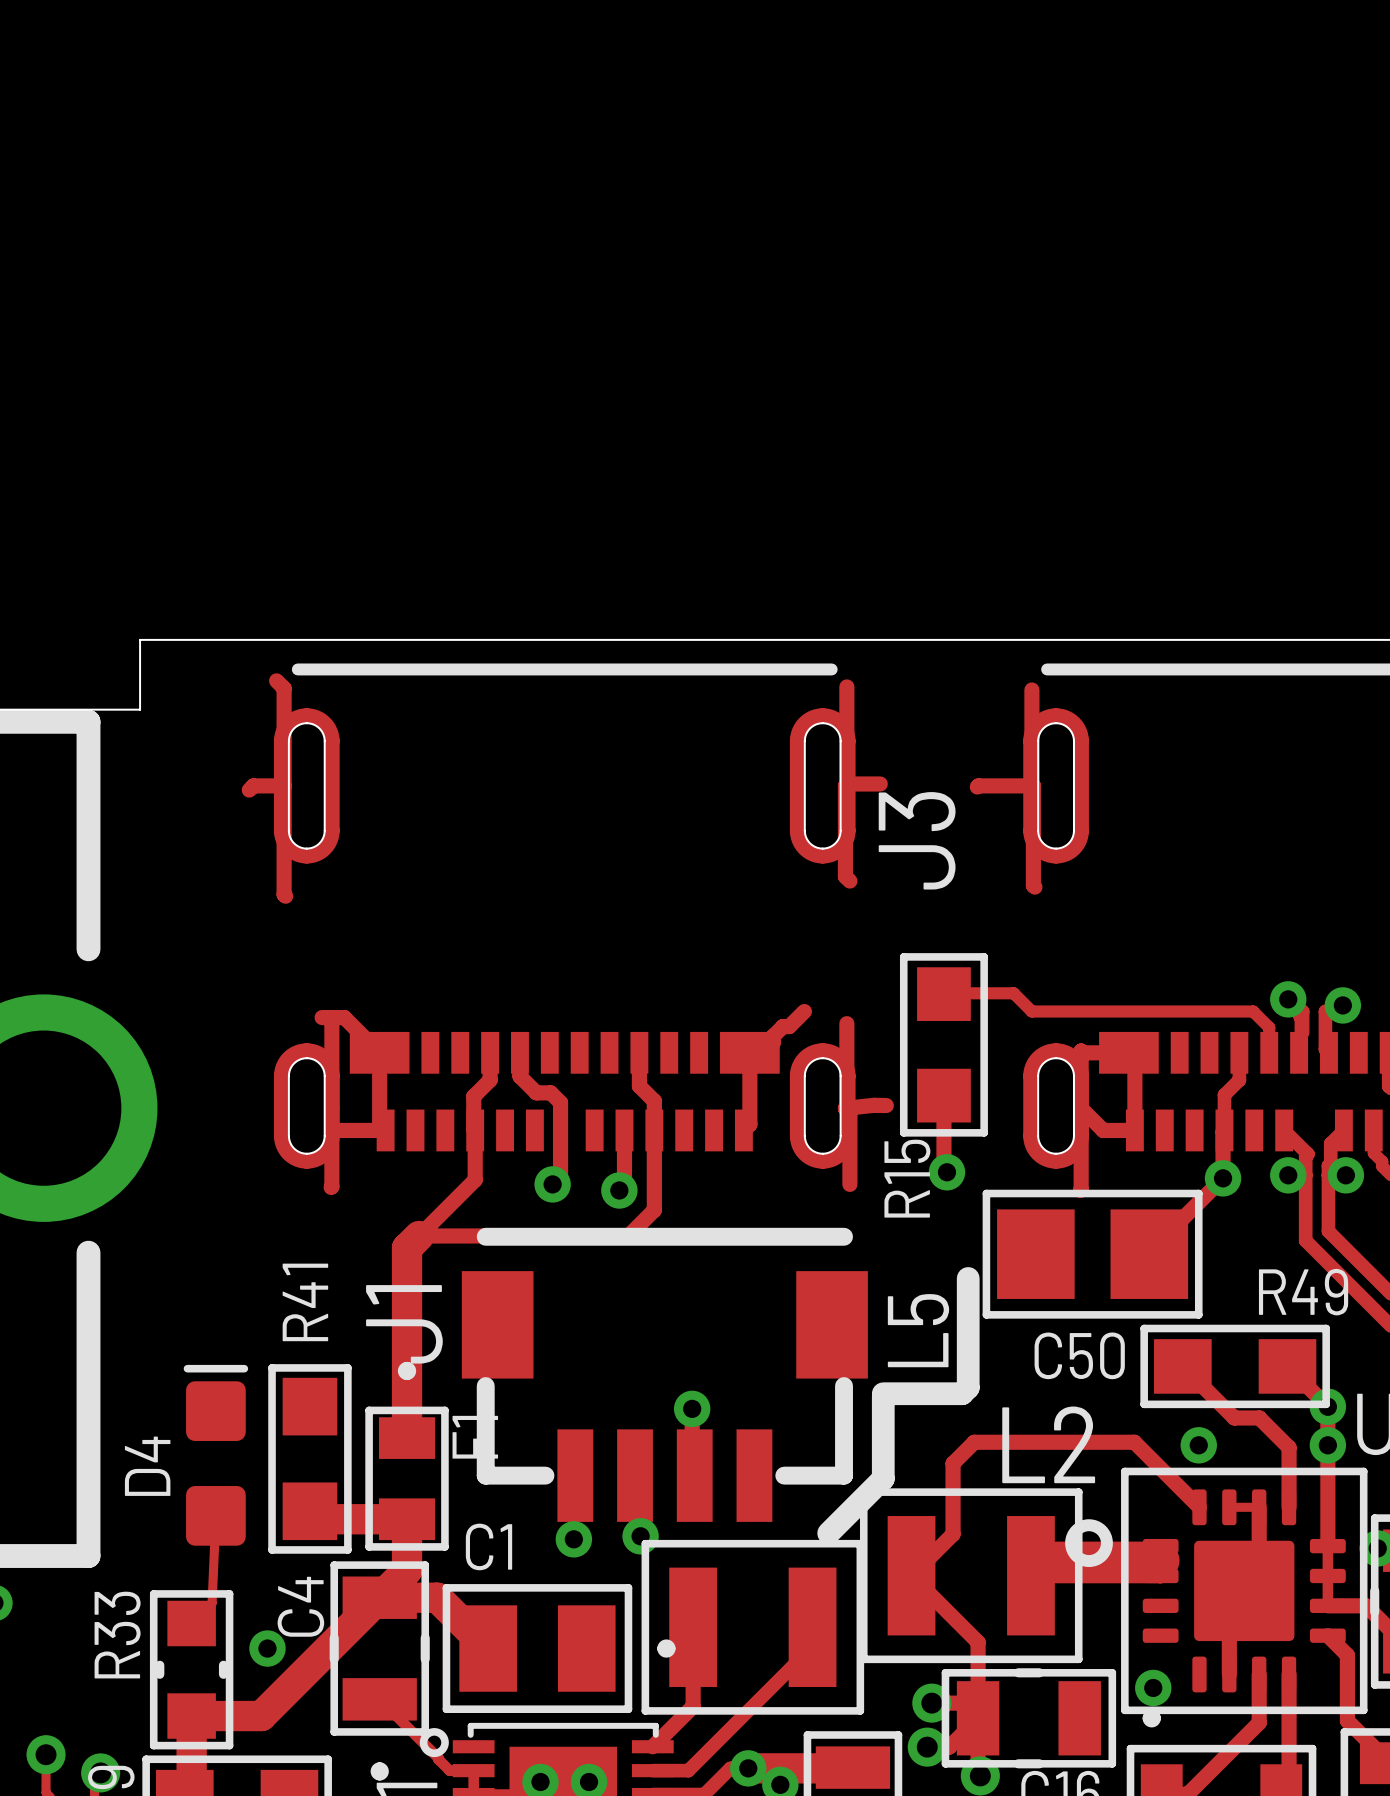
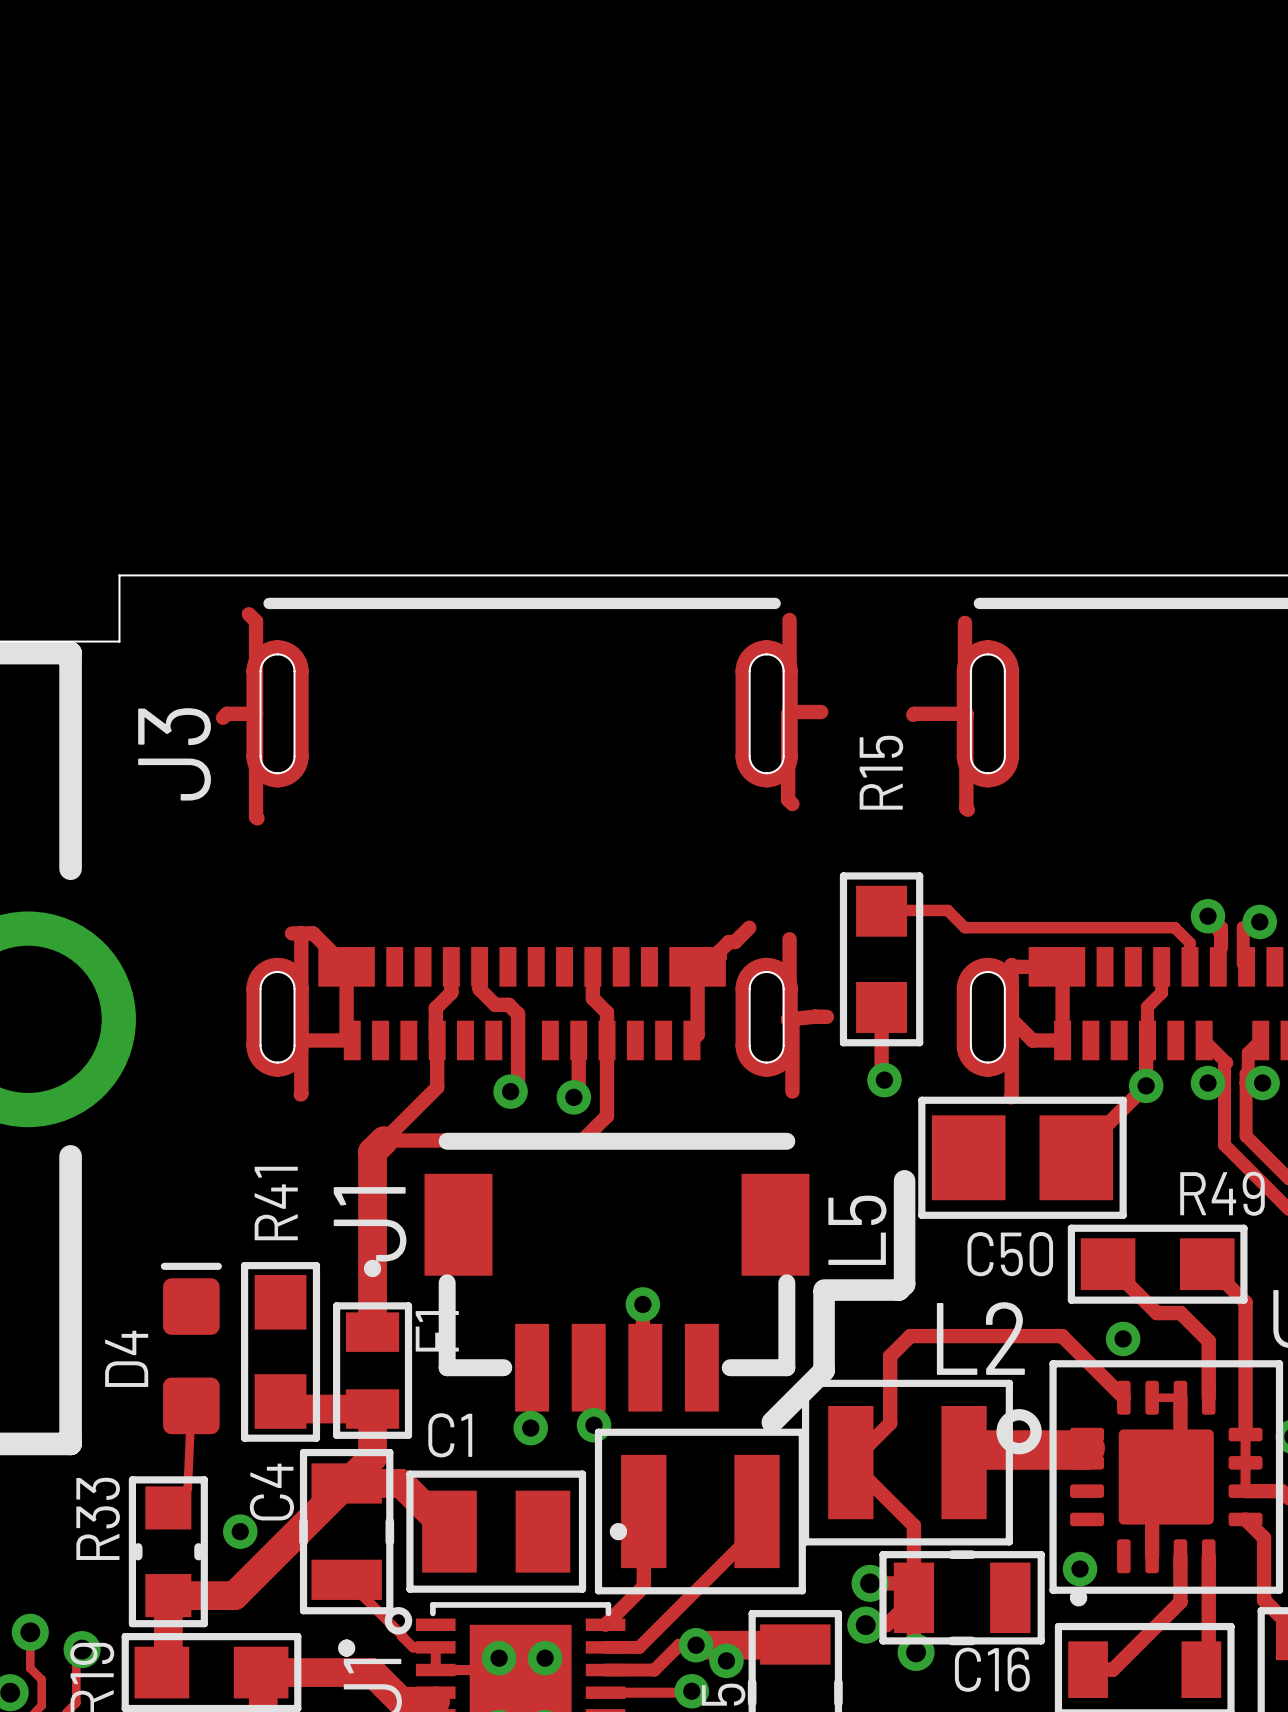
J3 name position: J3 (917, 840) -> J3 (174, 754)
R15 name position: R15 (907, 1178) -> R15 (881, 772)
via: (1327, 1406) -> none
via: (1327, 1445) -> none

